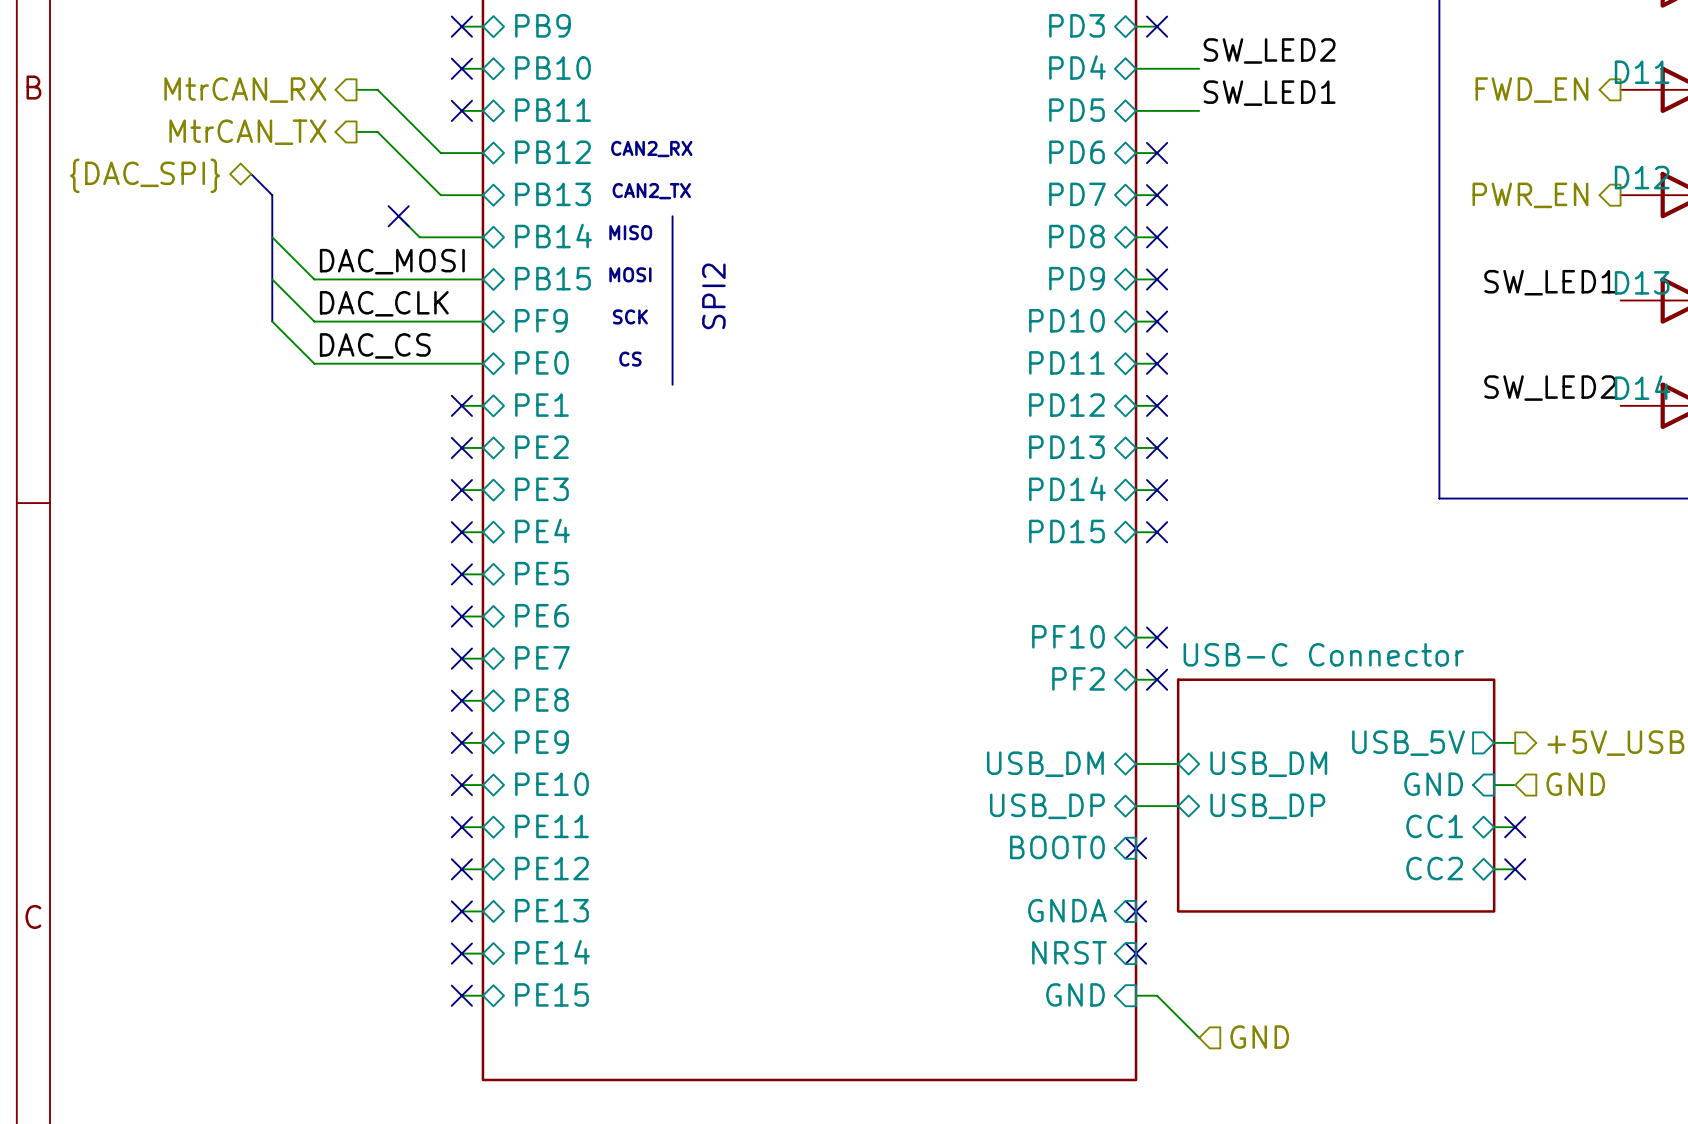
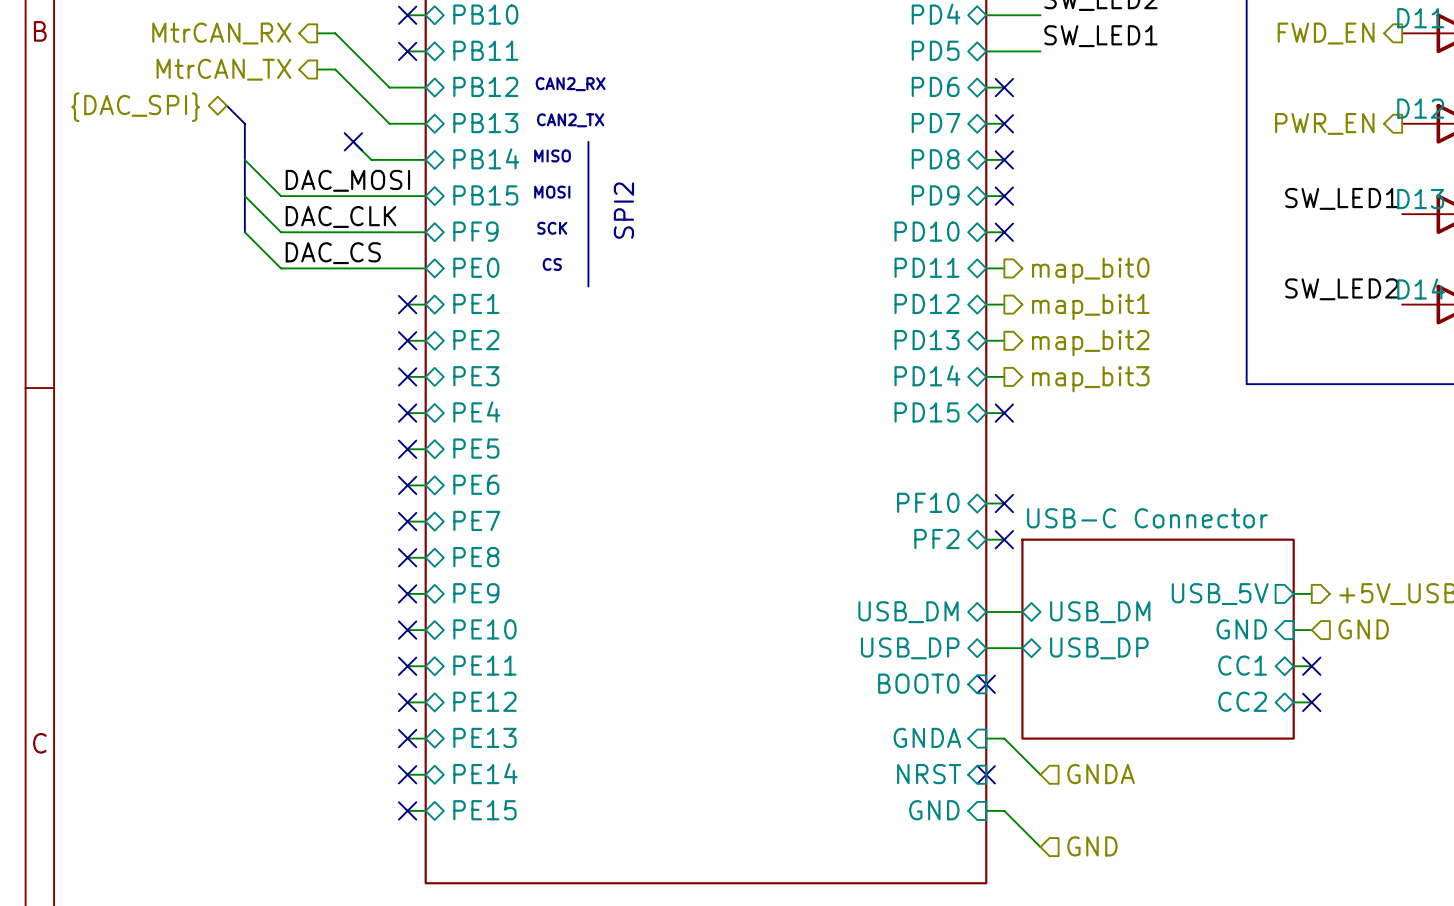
no-connect mark: (1157, 363) -> none
hierarchical label: none -> map_bit0 (1090, 270)
no-connect mark: (1157, 405) -> none
hierarchical label: none -> map_bit1 (1090, 306)
no-connect mark: (1157, 447) -> none
hierarchical label: none -> map_bit2 (1090, 343)
no-connect mark: (1157, 490) -> none
hierarchical label: none -> map_bit3 (1090, 379)
wire: none -> (986, 738) (1004, 738) (1040, 774)
no-connect mark: (1136, 911) -> none
hierarchical label: none -> GNDA (1101, 774)

